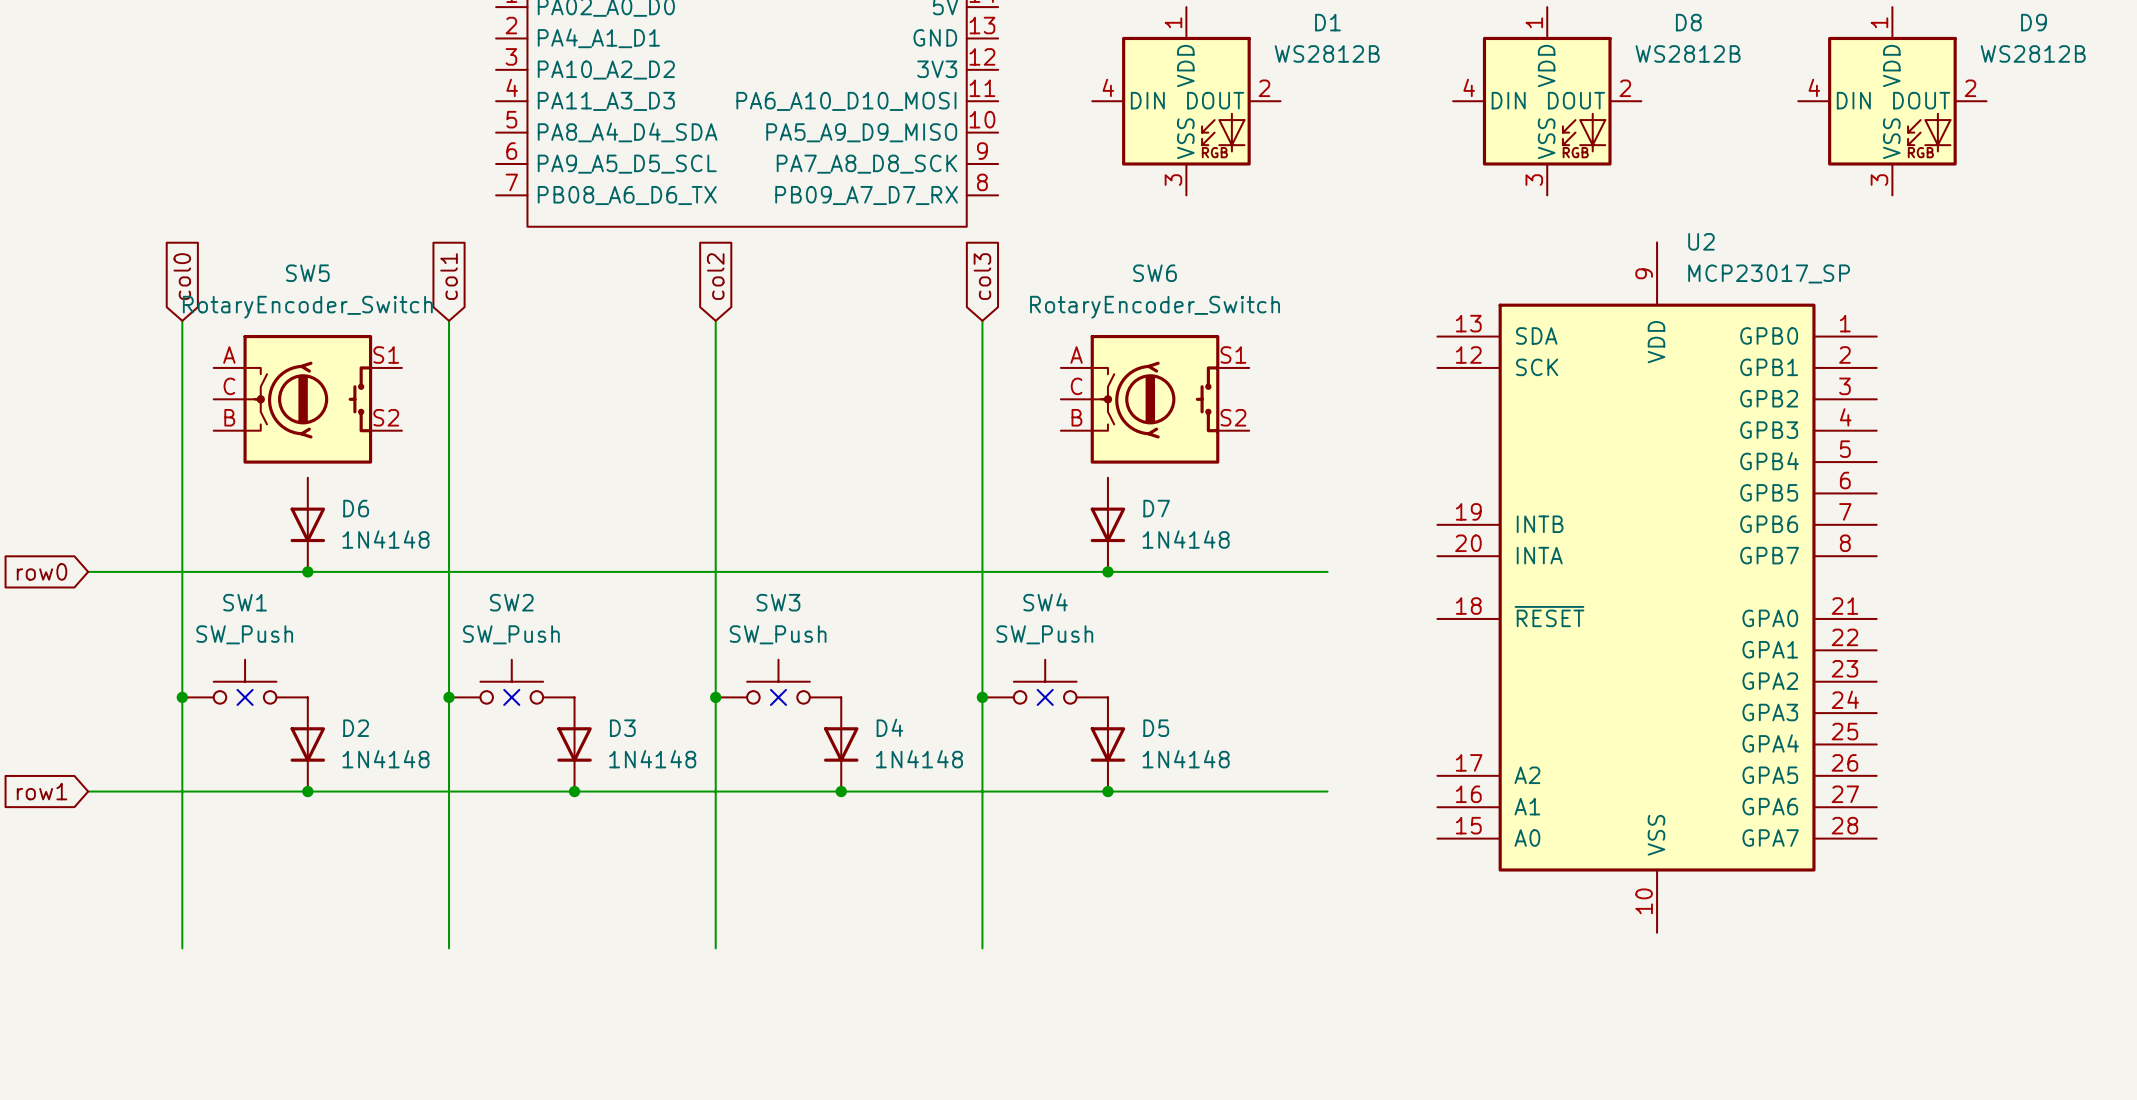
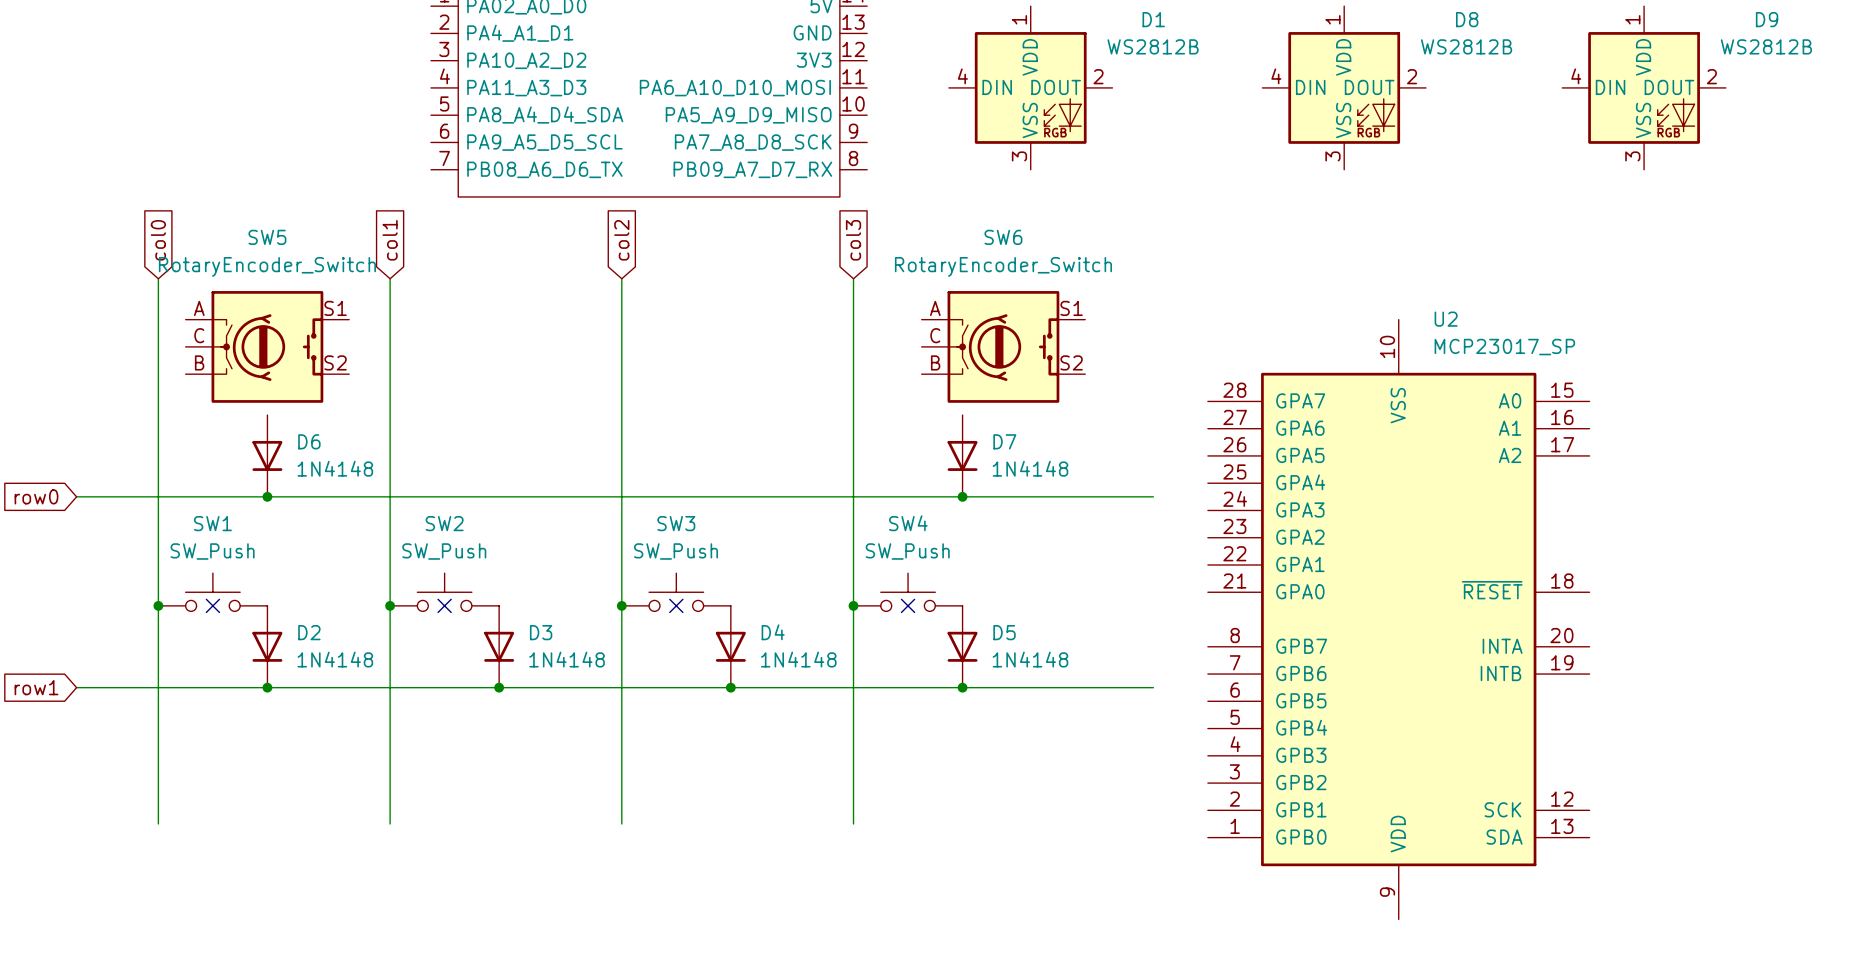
U2 rotation: 0° (1657, 587) -> 180° (1398, 619)

